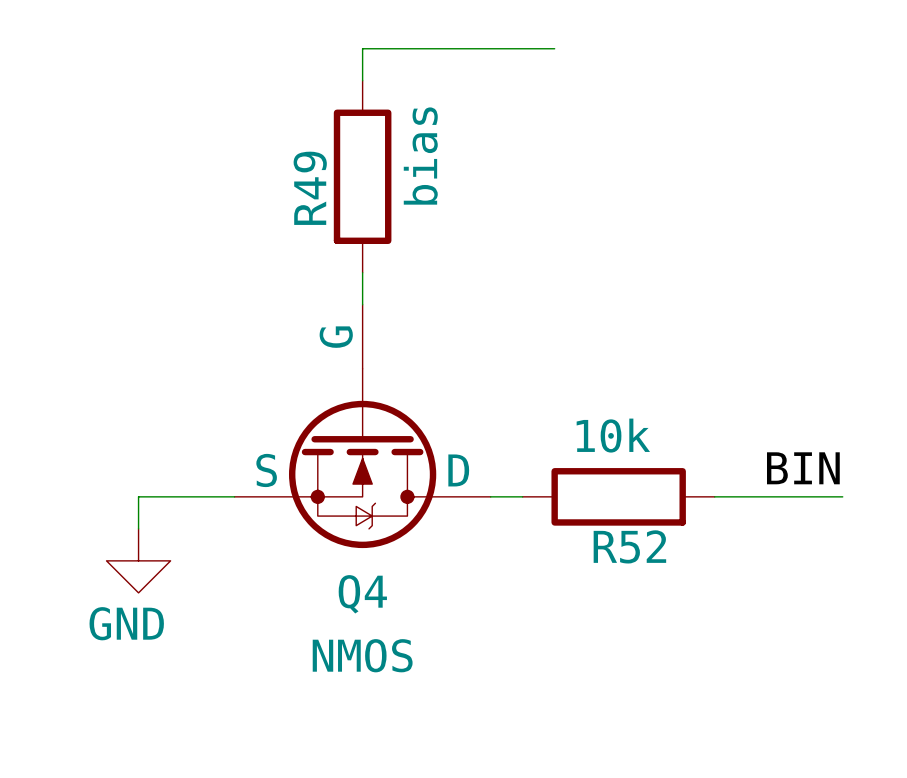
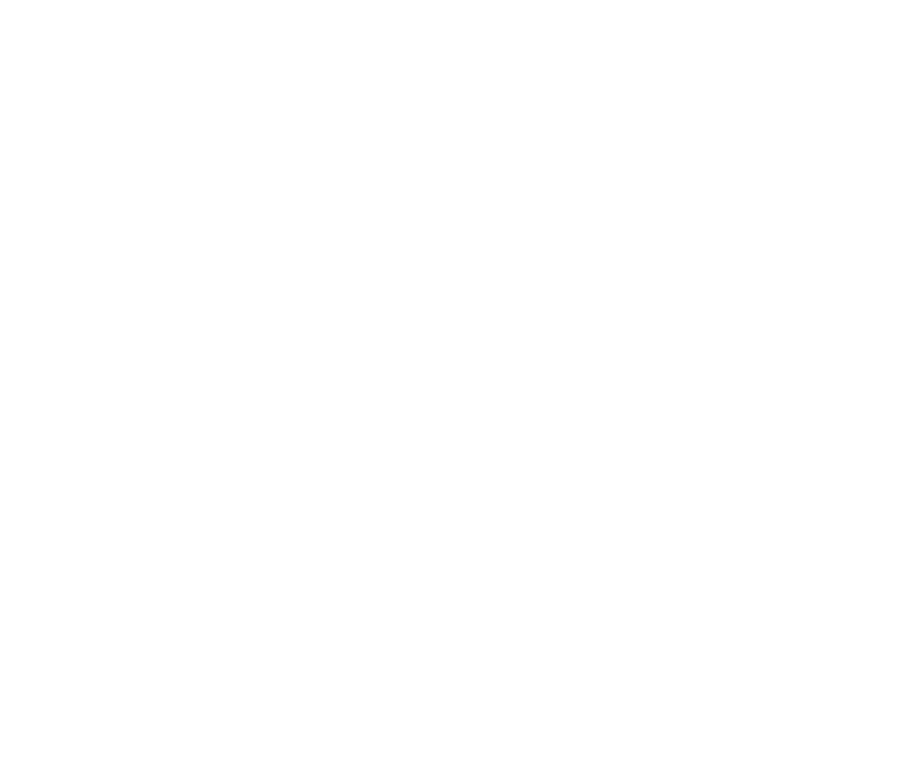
wire: (554, 48) (362, 48) (362, 80) -> none
R49: bias (362, 176) -> none
wire: (362, 272) (362, 304) -> none
Q4: NMOS (362, 426) -> none
label: BIN (803, 468) -> none
wire: (234, 496) (138, 496) (138, 528) -> none
wire: (490, 496) (522, 496) -> none
R52: 10k (618, 496) -> none
wire: (714, 496) (842, 496) -> none
power symbol: GND (138, 560) -> none

